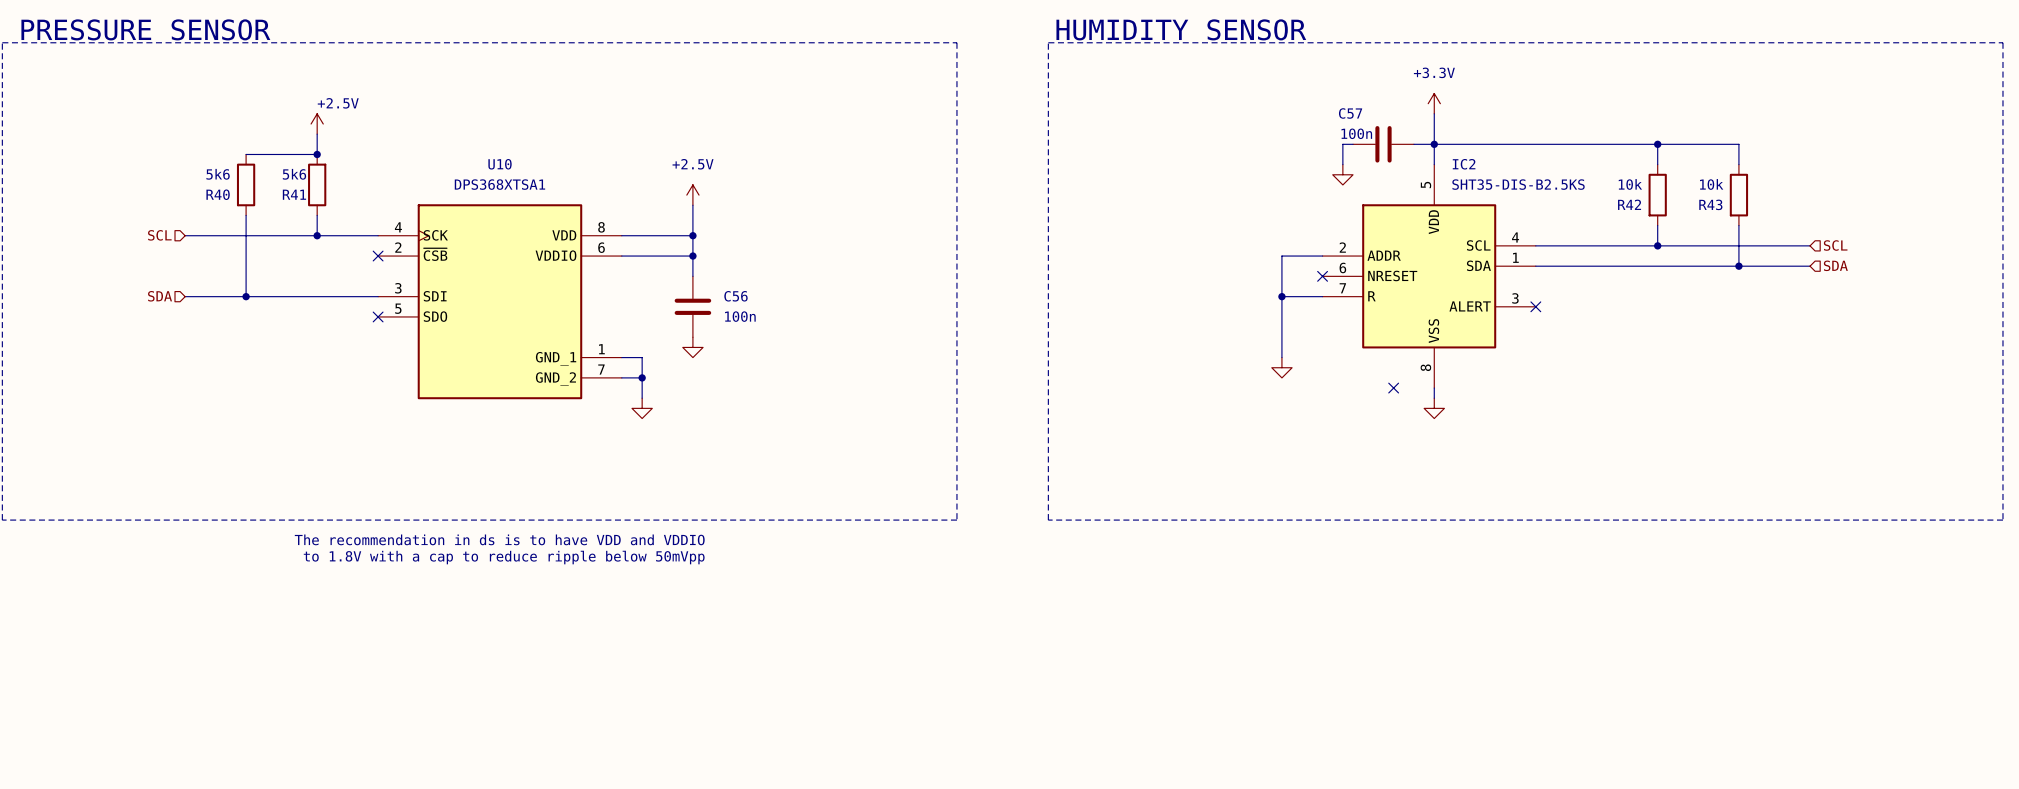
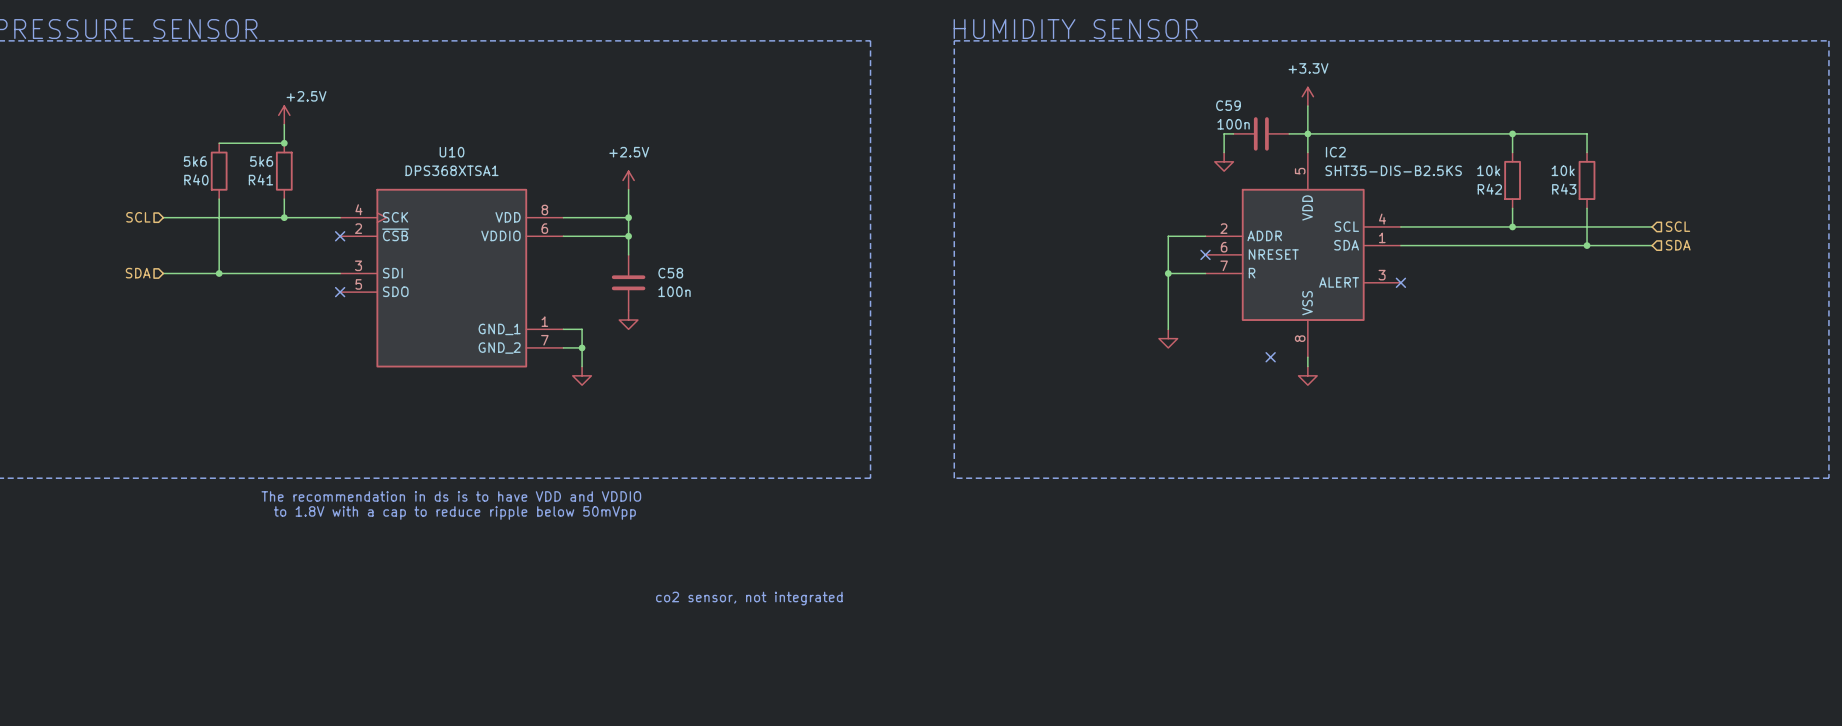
C57 name: C57 (1350, 113) -> C59 (1228, 105)
C56 name: C56 (735, 296) -> C58 (670, 273)
text: none -> co2 sensor, not integrated (749, 598)

